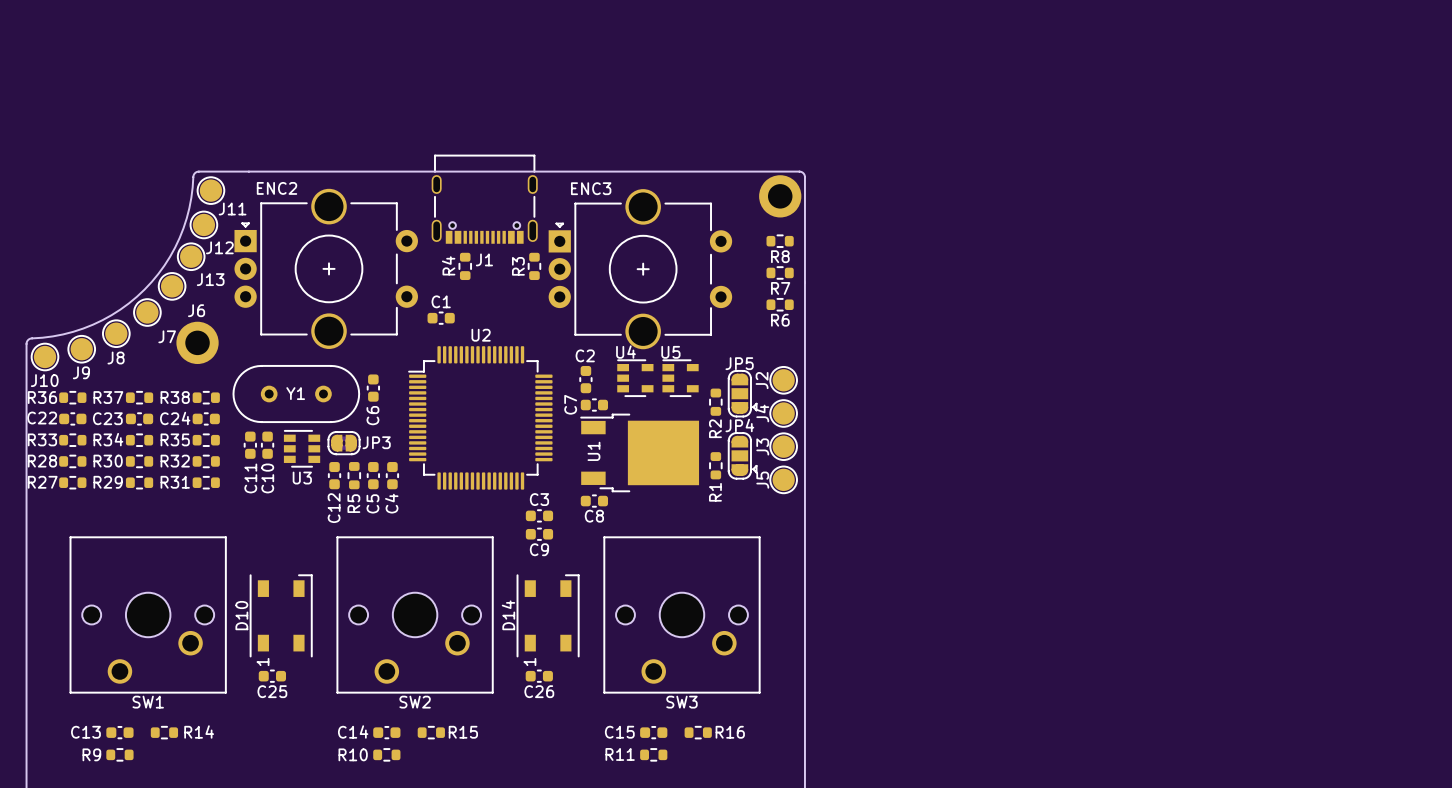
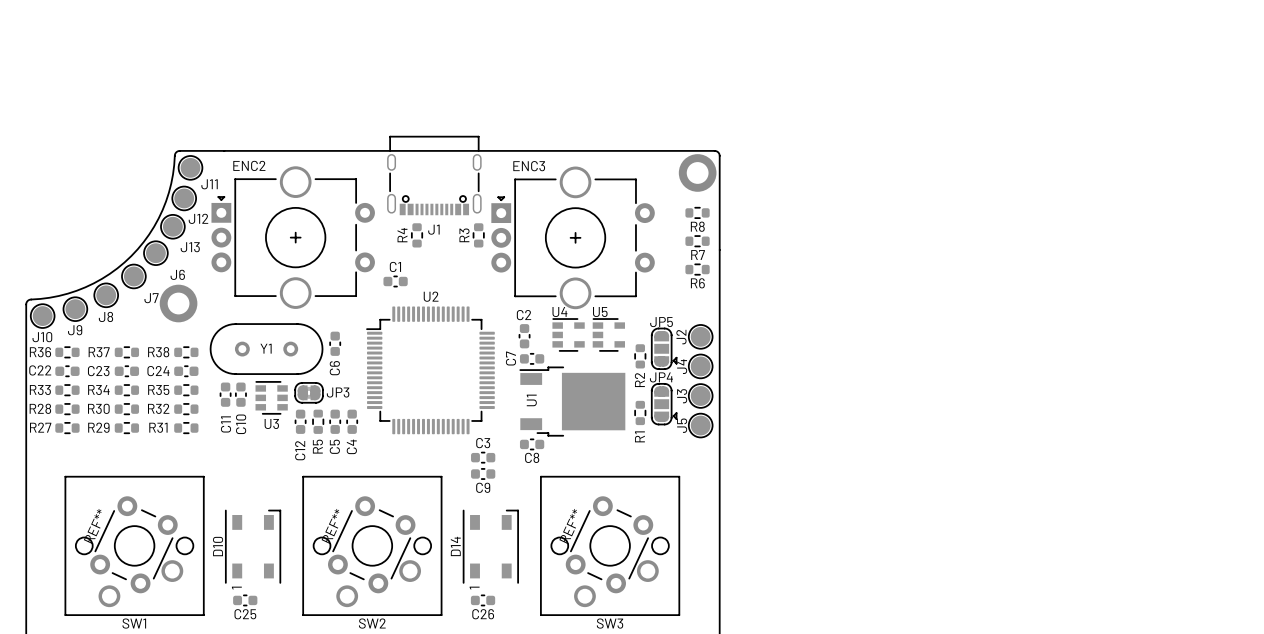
REF**: none -> (133, 544)
REF**: none -> (371, 544)
REF**: none -> (609, 544)

